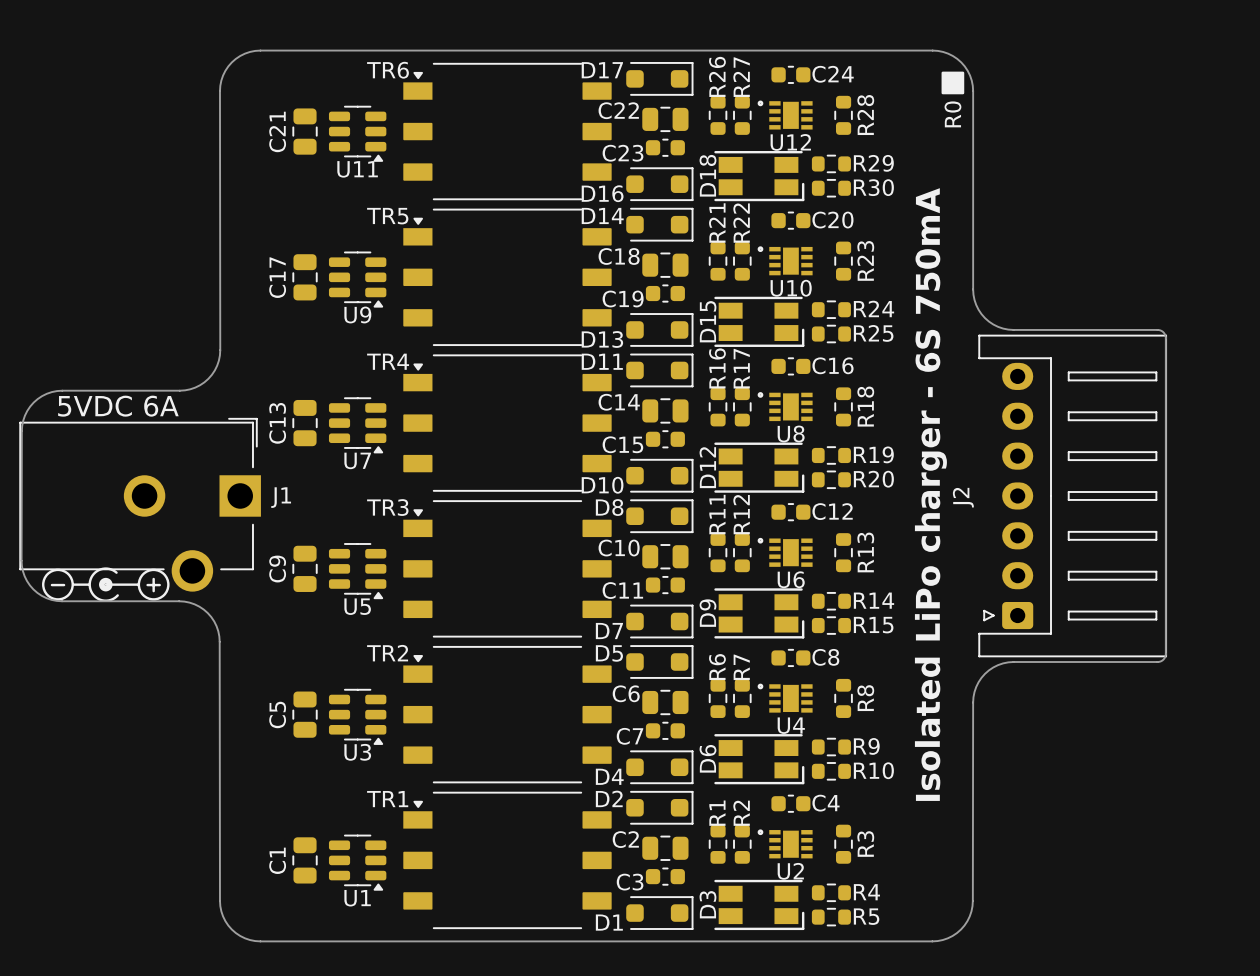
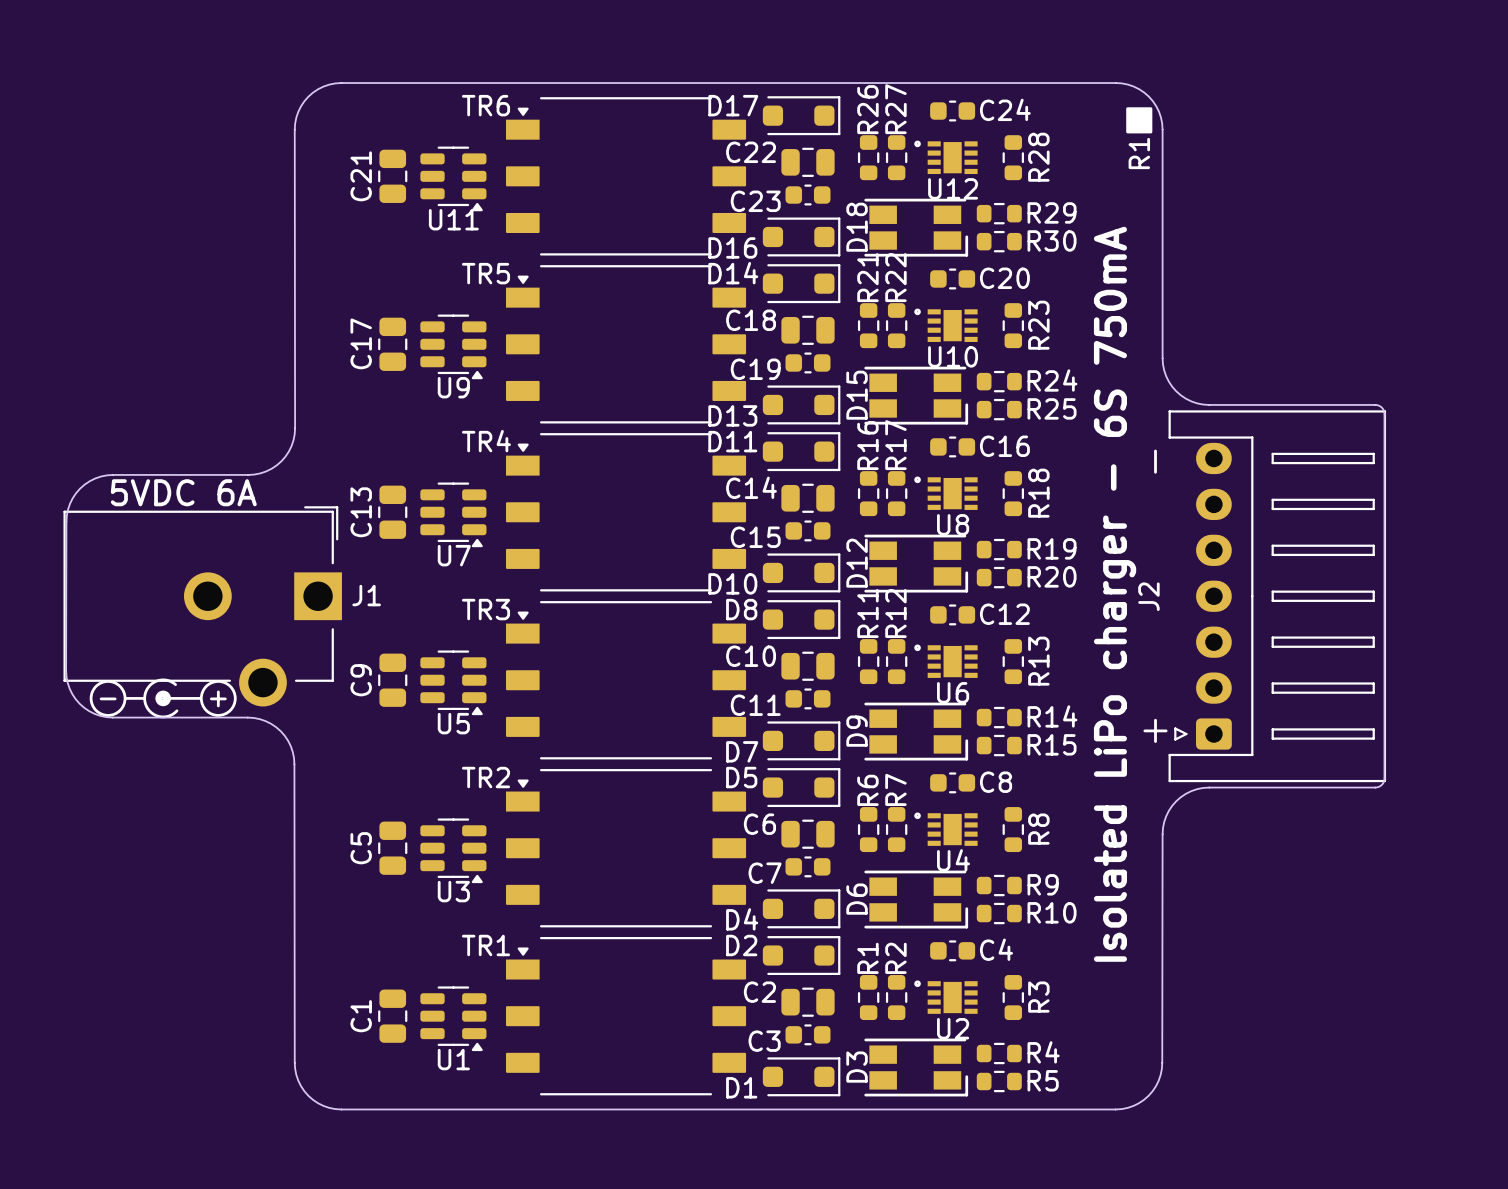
text: R0 (952, 114) -> R1 (1139, 153)
text: none -> + - (1155, 596)

